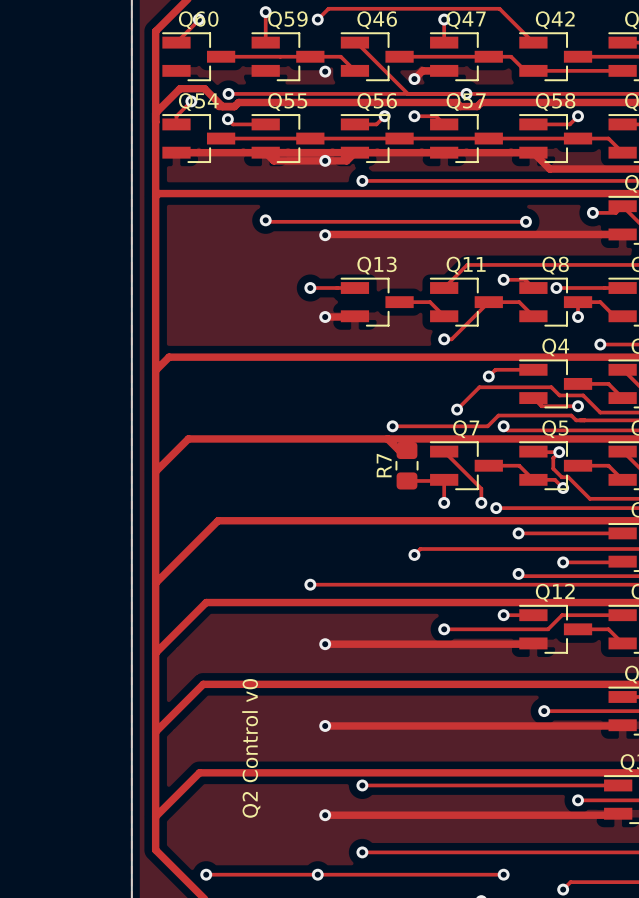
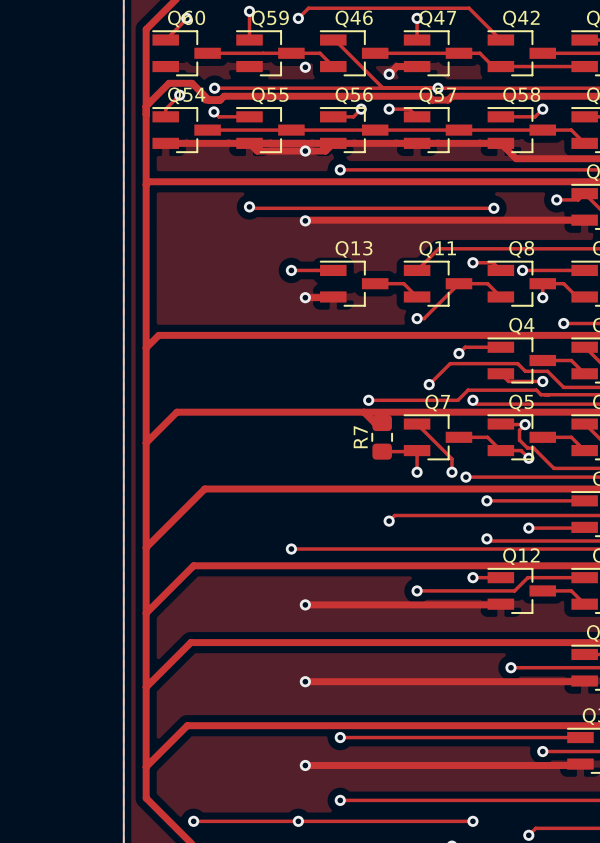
text: Q2 Control v0 (251, 748) -> none

